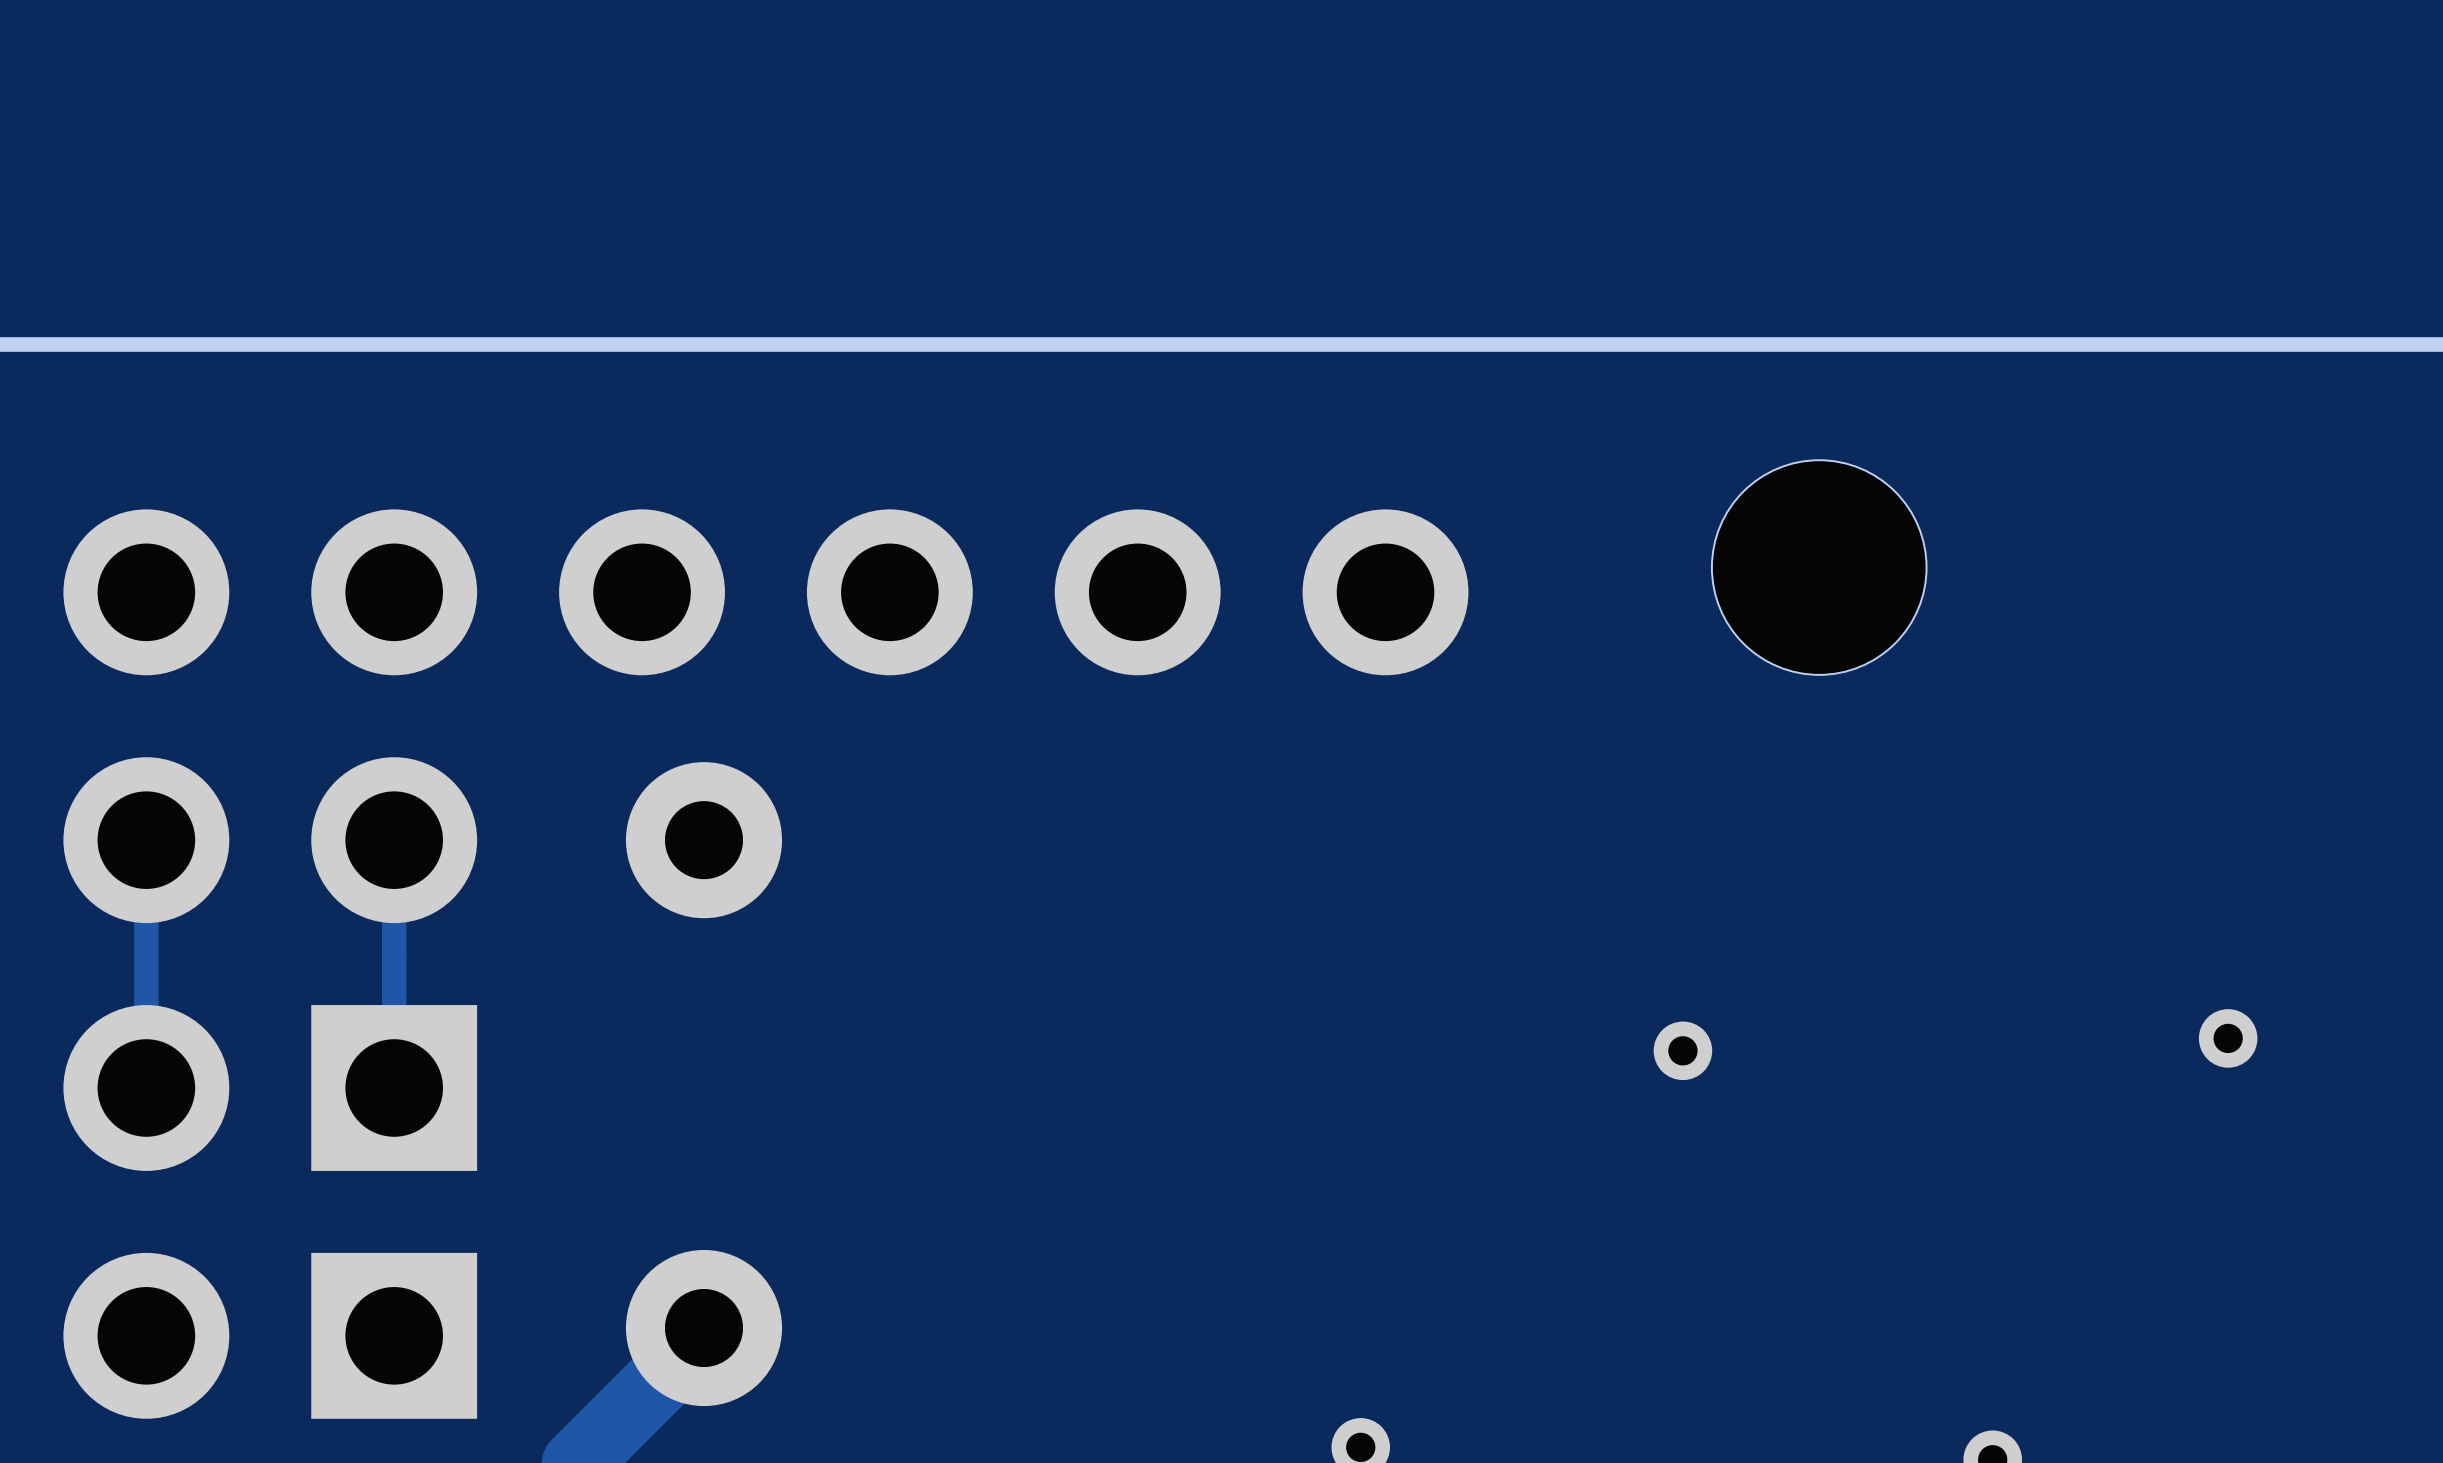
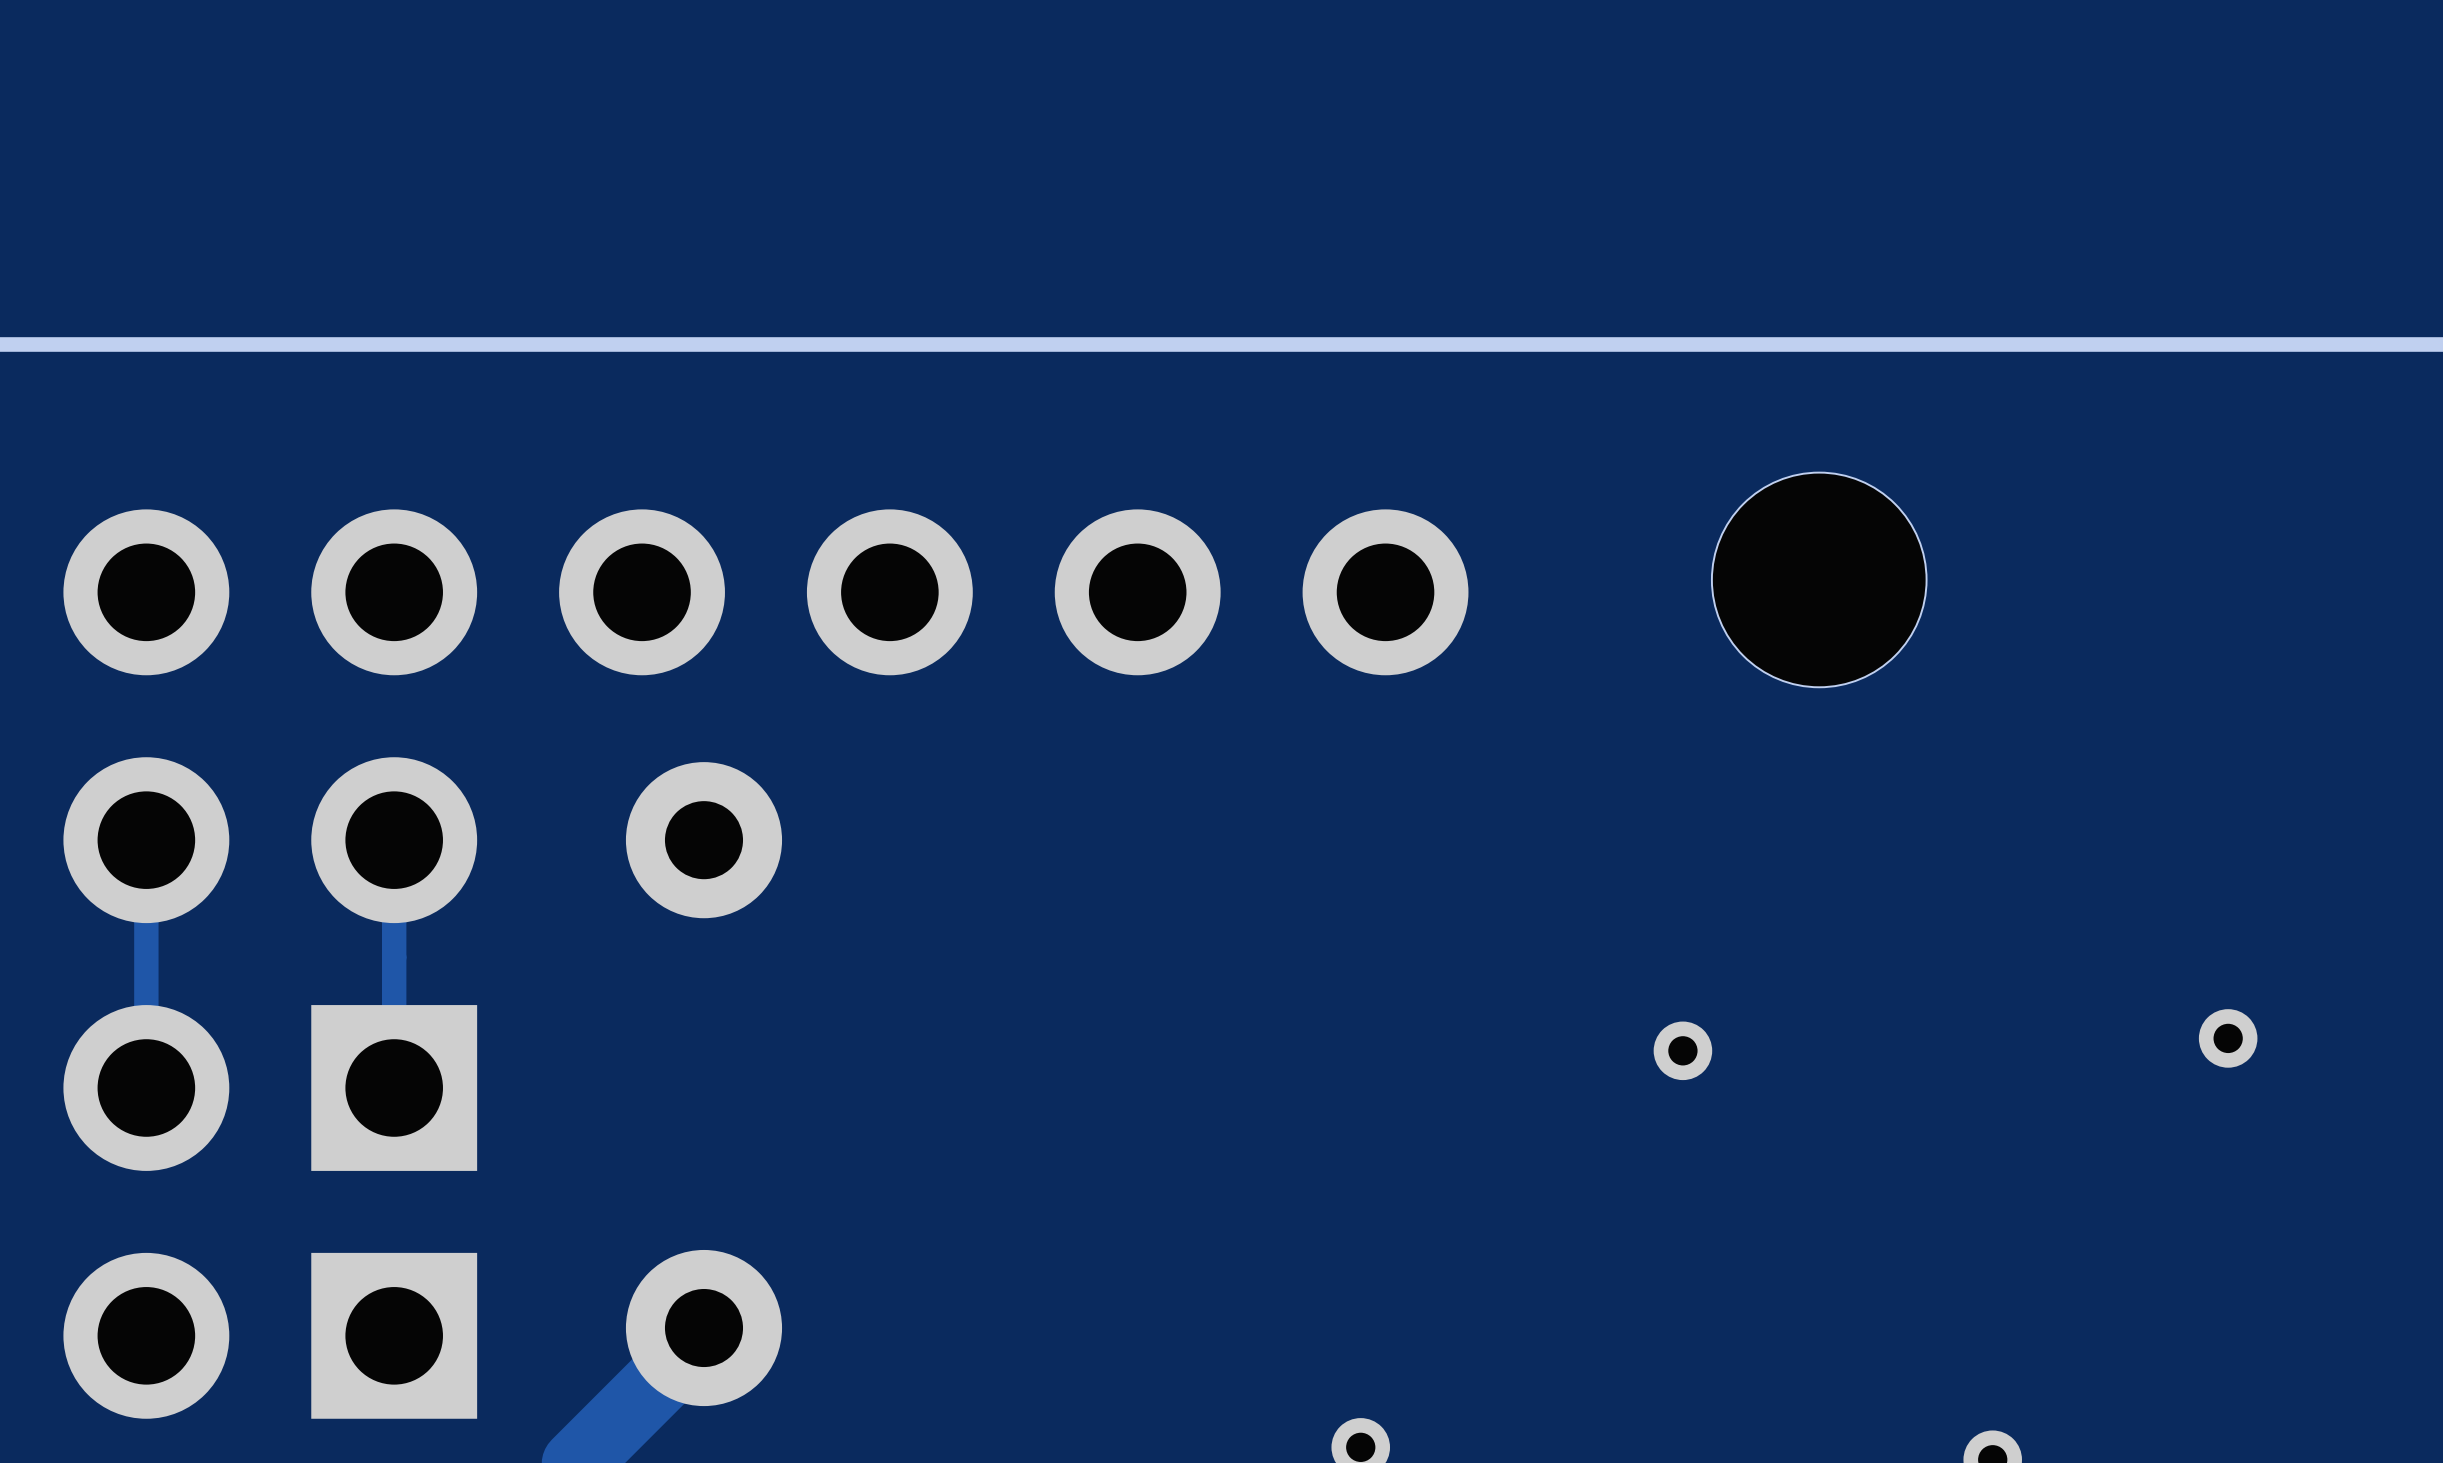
part position: (1819, 567) -> (1819, 579)

